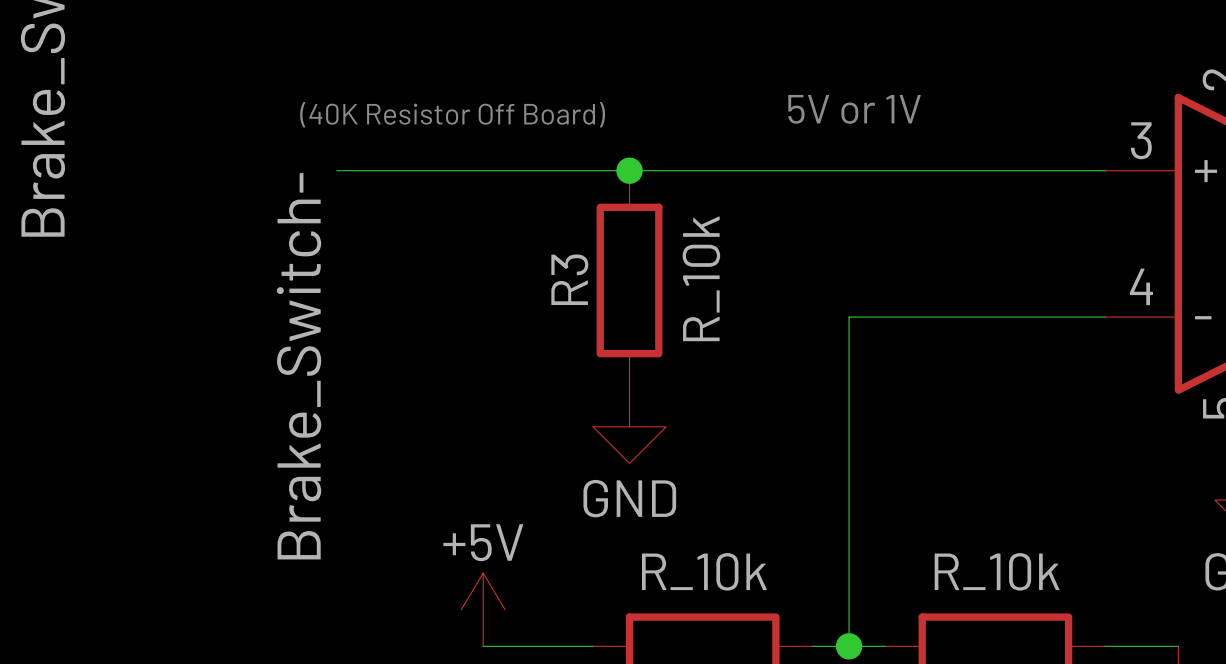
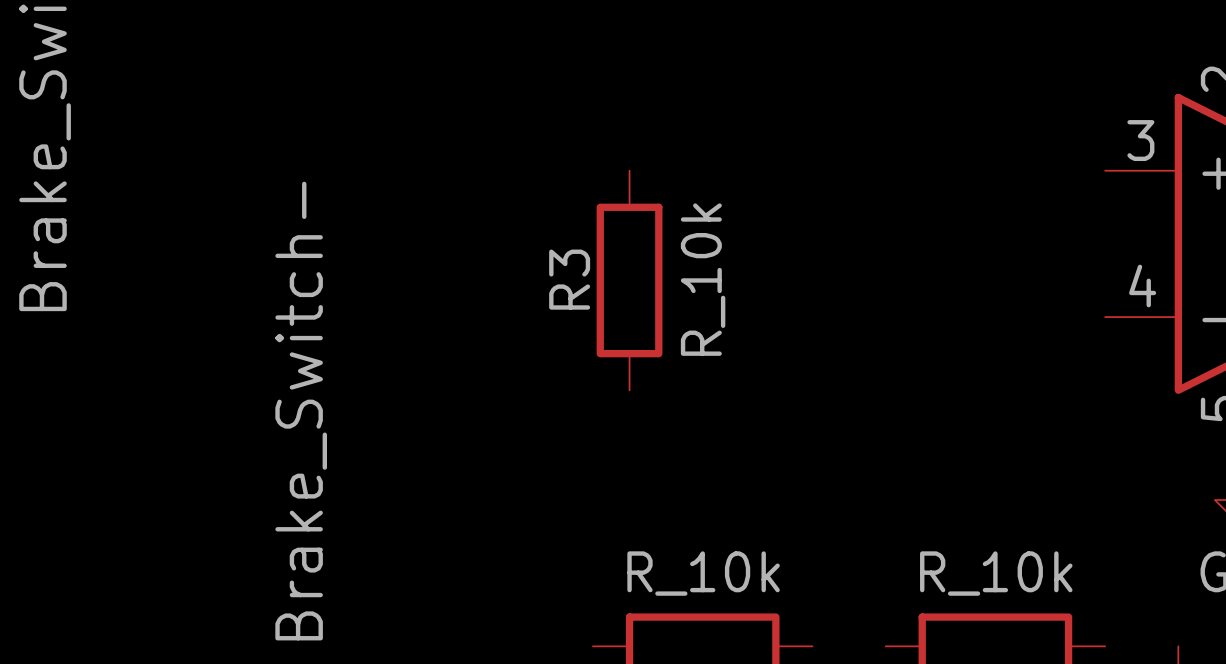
text: 5V or 1V (854, 109) -> none
text: (40K Resistor Off Board) (452, 114) -> none
wire: (336, 170) (1105, 170) -> none
junction: (629, 170) -> none
wire: (1105, 317) (849, 317) (849, 646) -> none
power symbol: GND (629, 426) -> none
power symbol: +5V (483, 609) -> none
wire: (483, 646) (592, 646) -> none
wire: (812, 646) (885, 646) -> none
junction: (849, 646) -> none
wire: (1105, 646) (1178, 646) -> none

